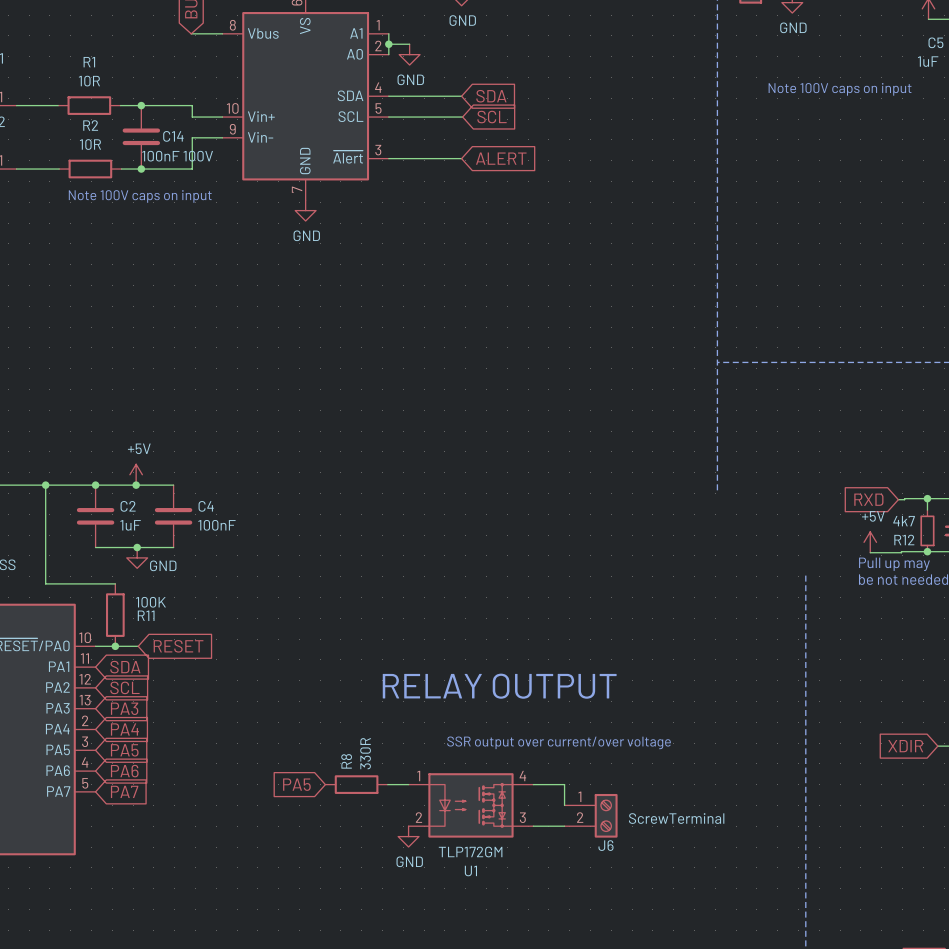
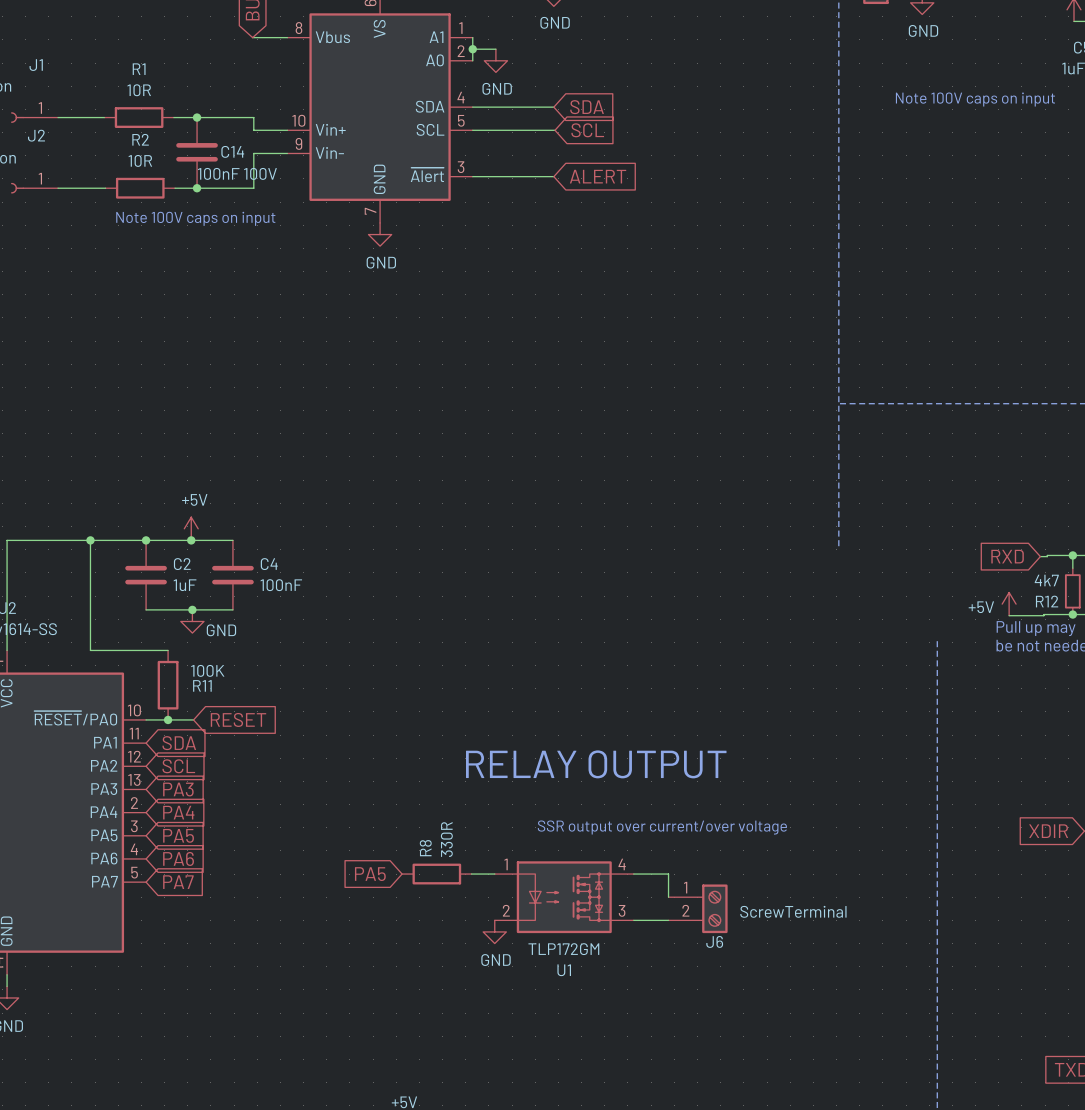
power symbol text position: +5V (873, 516) -> +5V (981, 607)

